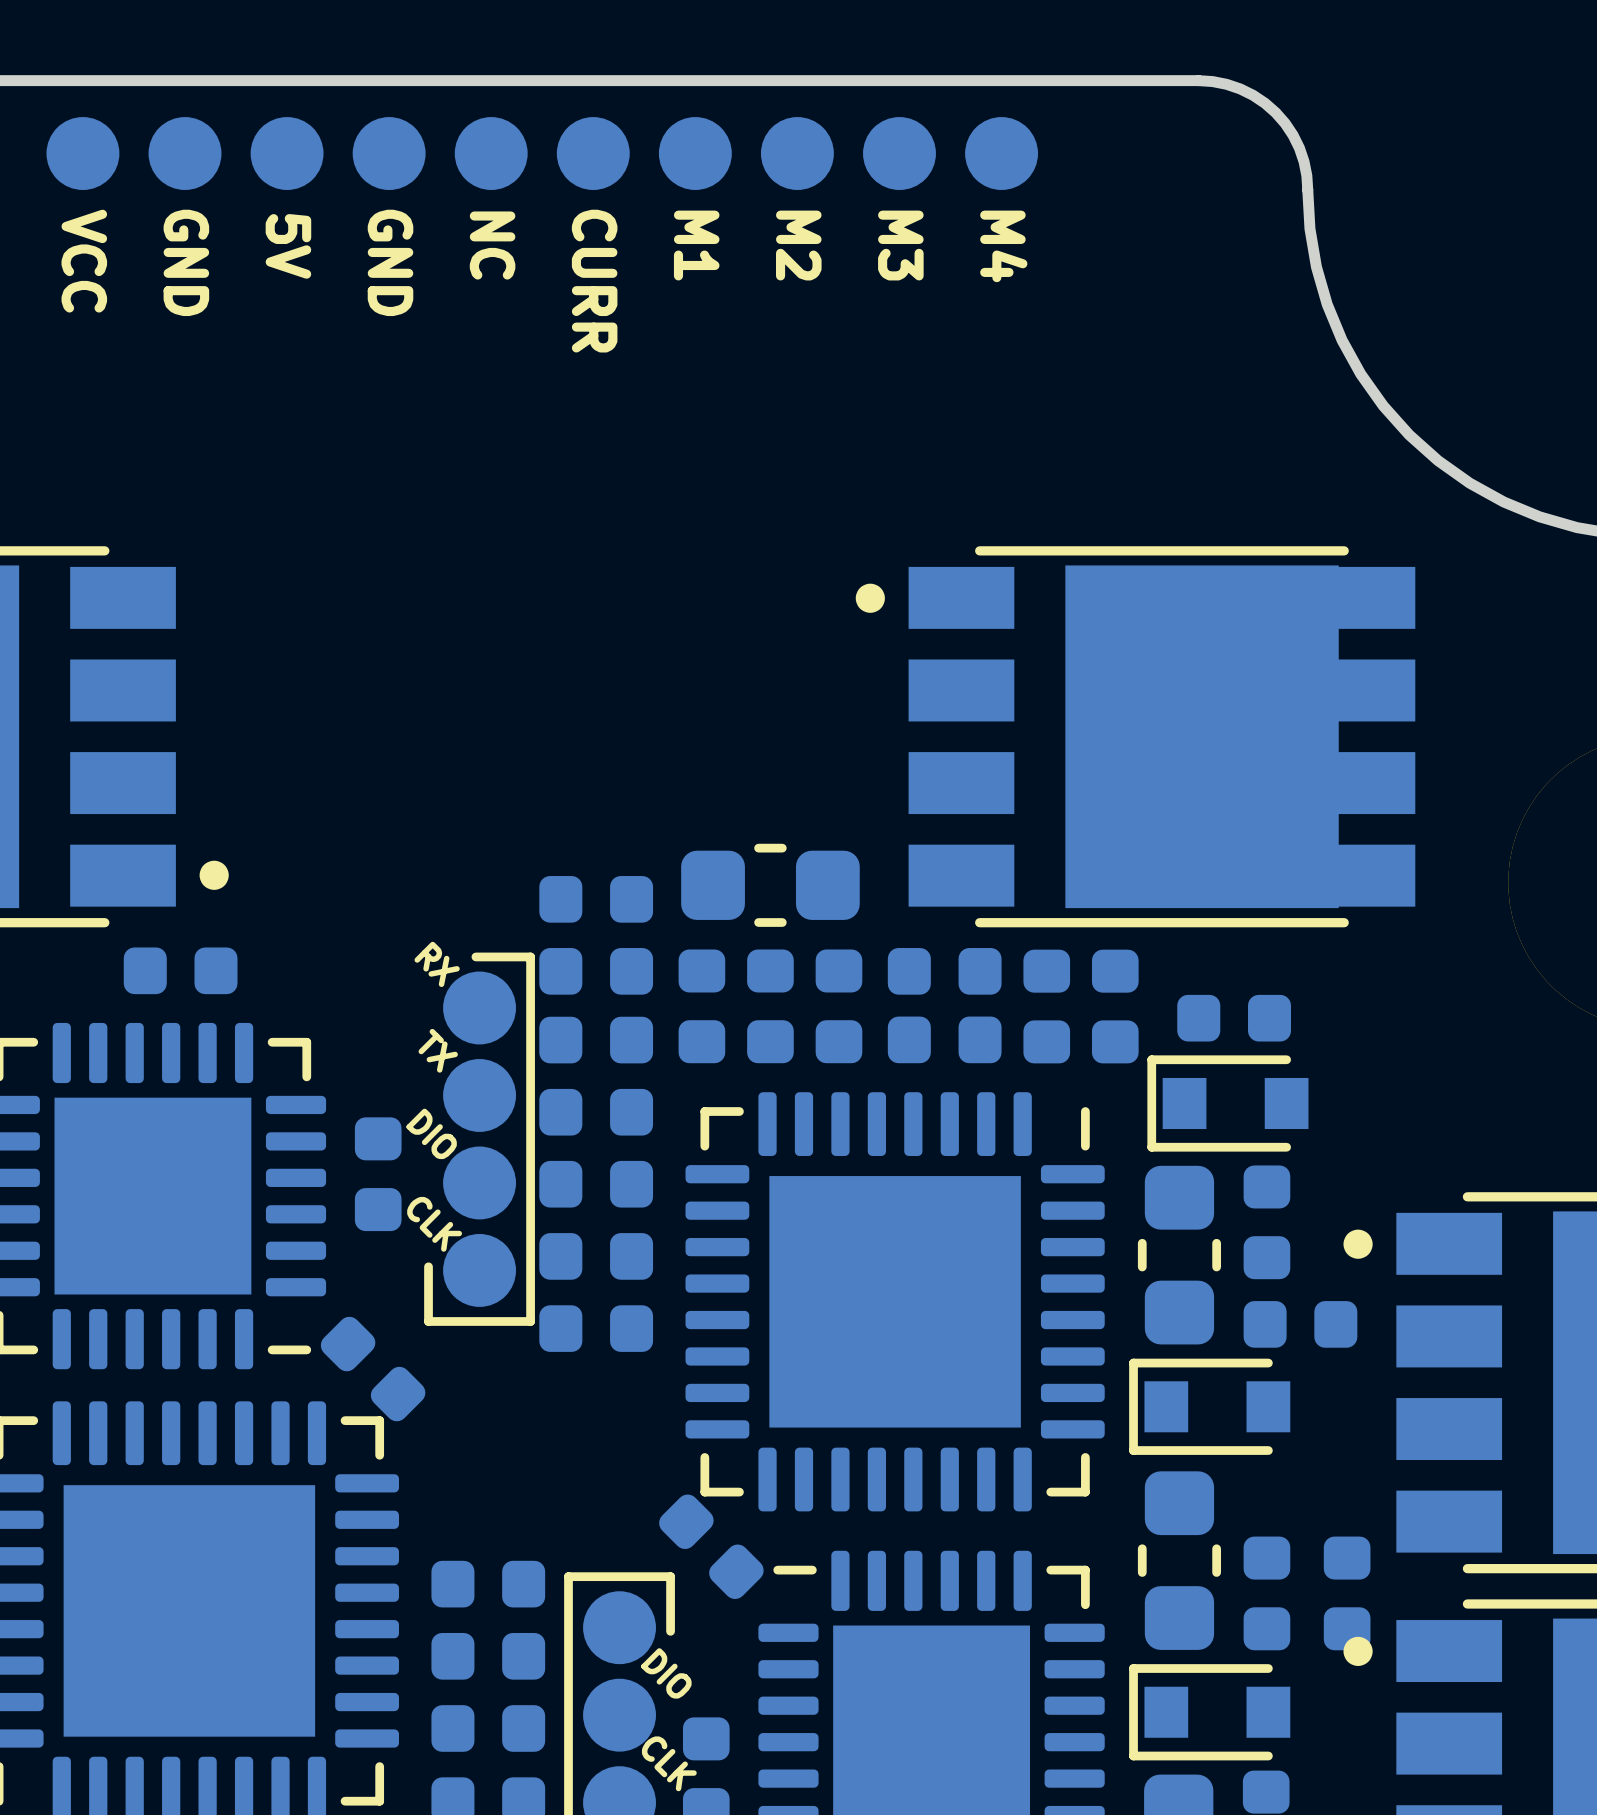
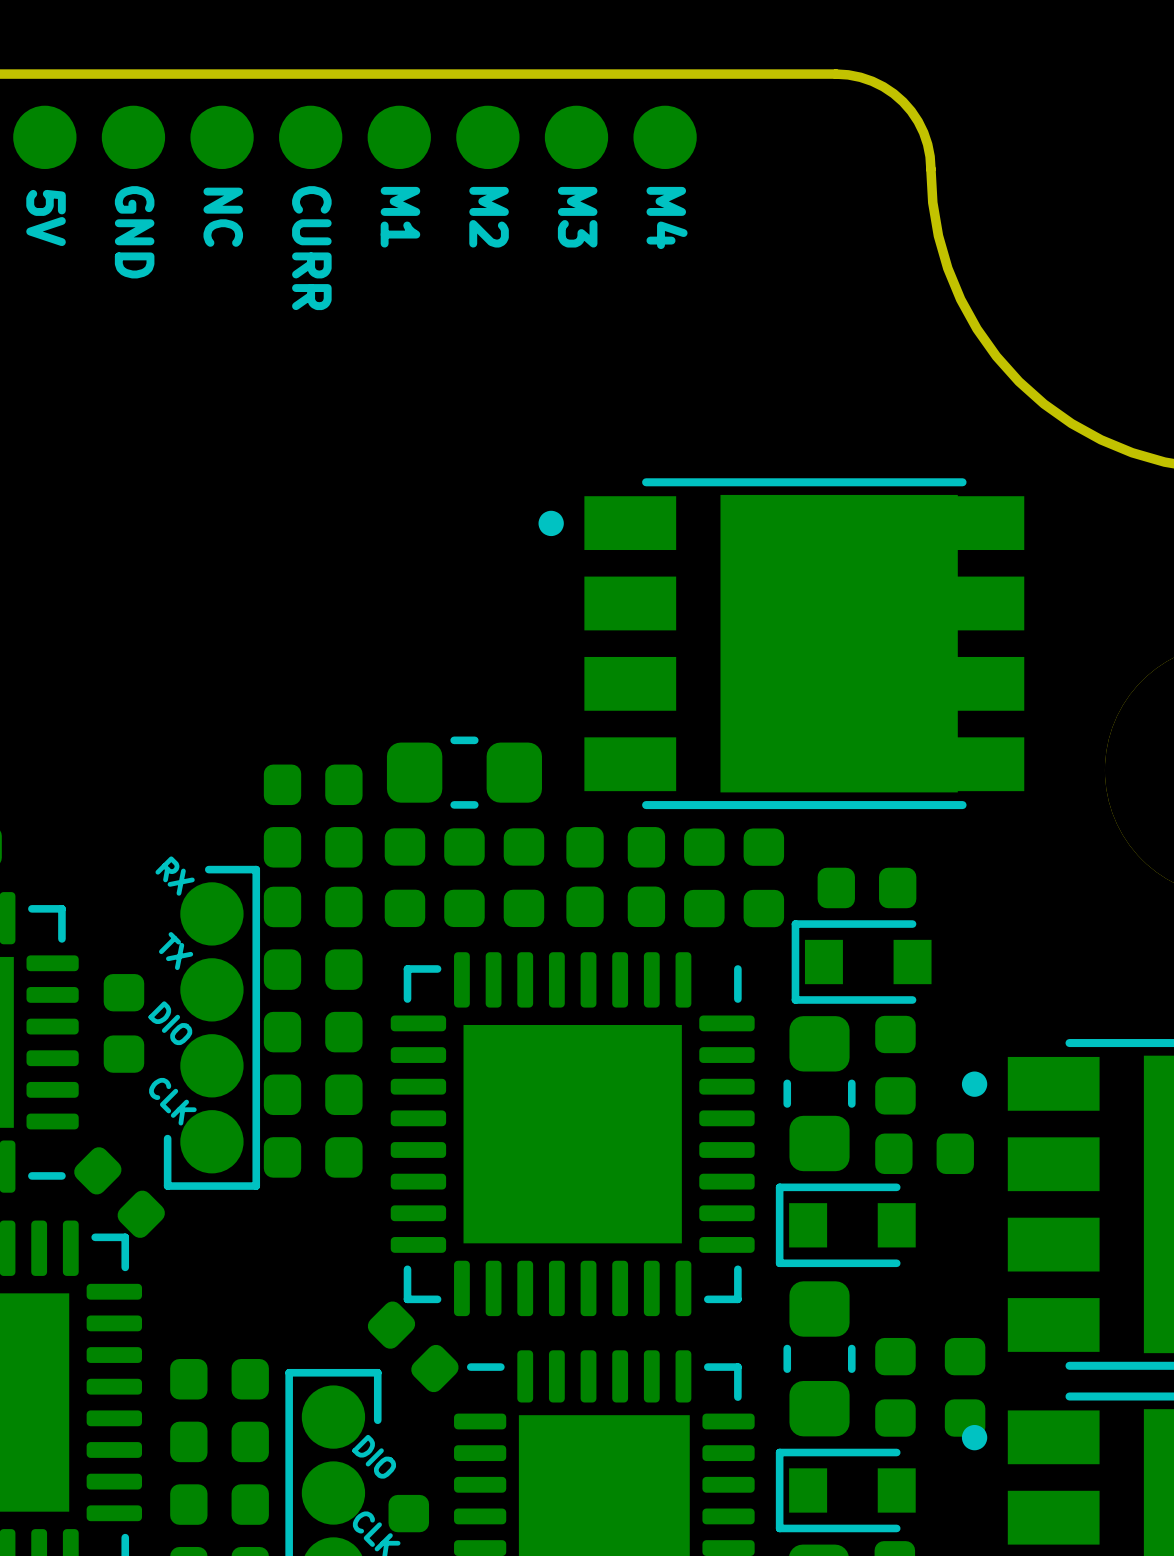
text position: RX (437, 964) -> RX (175, 876)
text position: TX (438, 1050) -> TX (176, 951)
text position: DIO (431, 1133) -> DIO (170, 1023)
part position: (479, 1139) -> (211, 1027)
text position: CLK (434, 1224) -> CLK (172, 1101)

